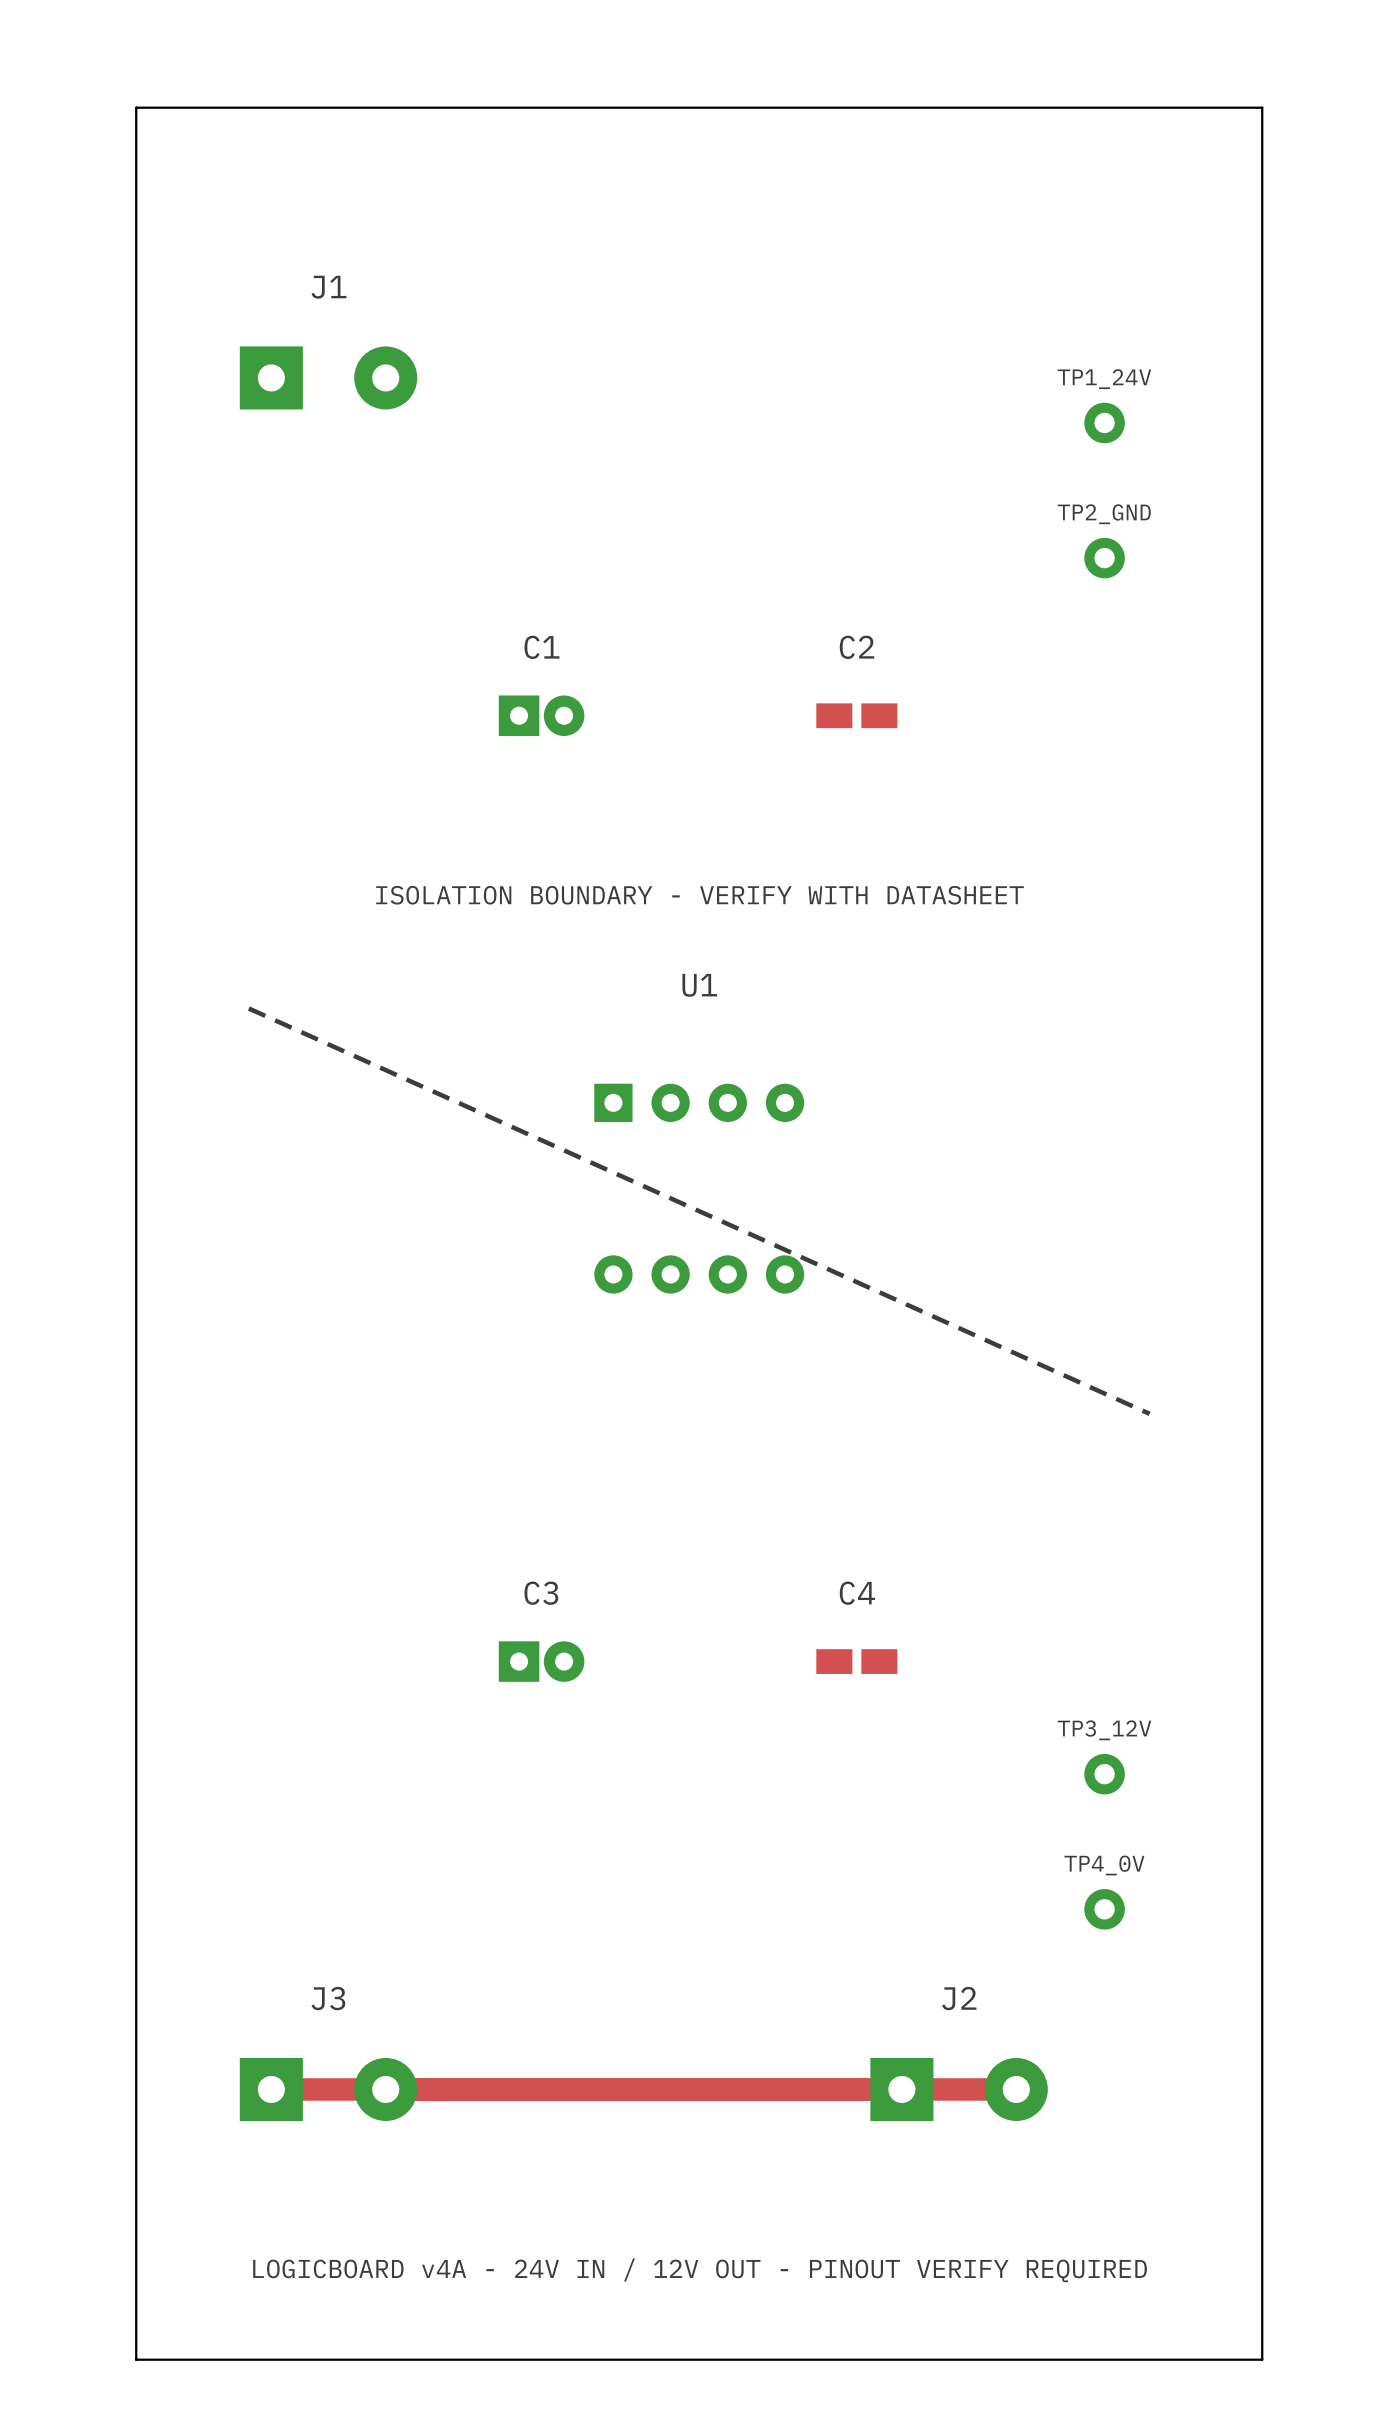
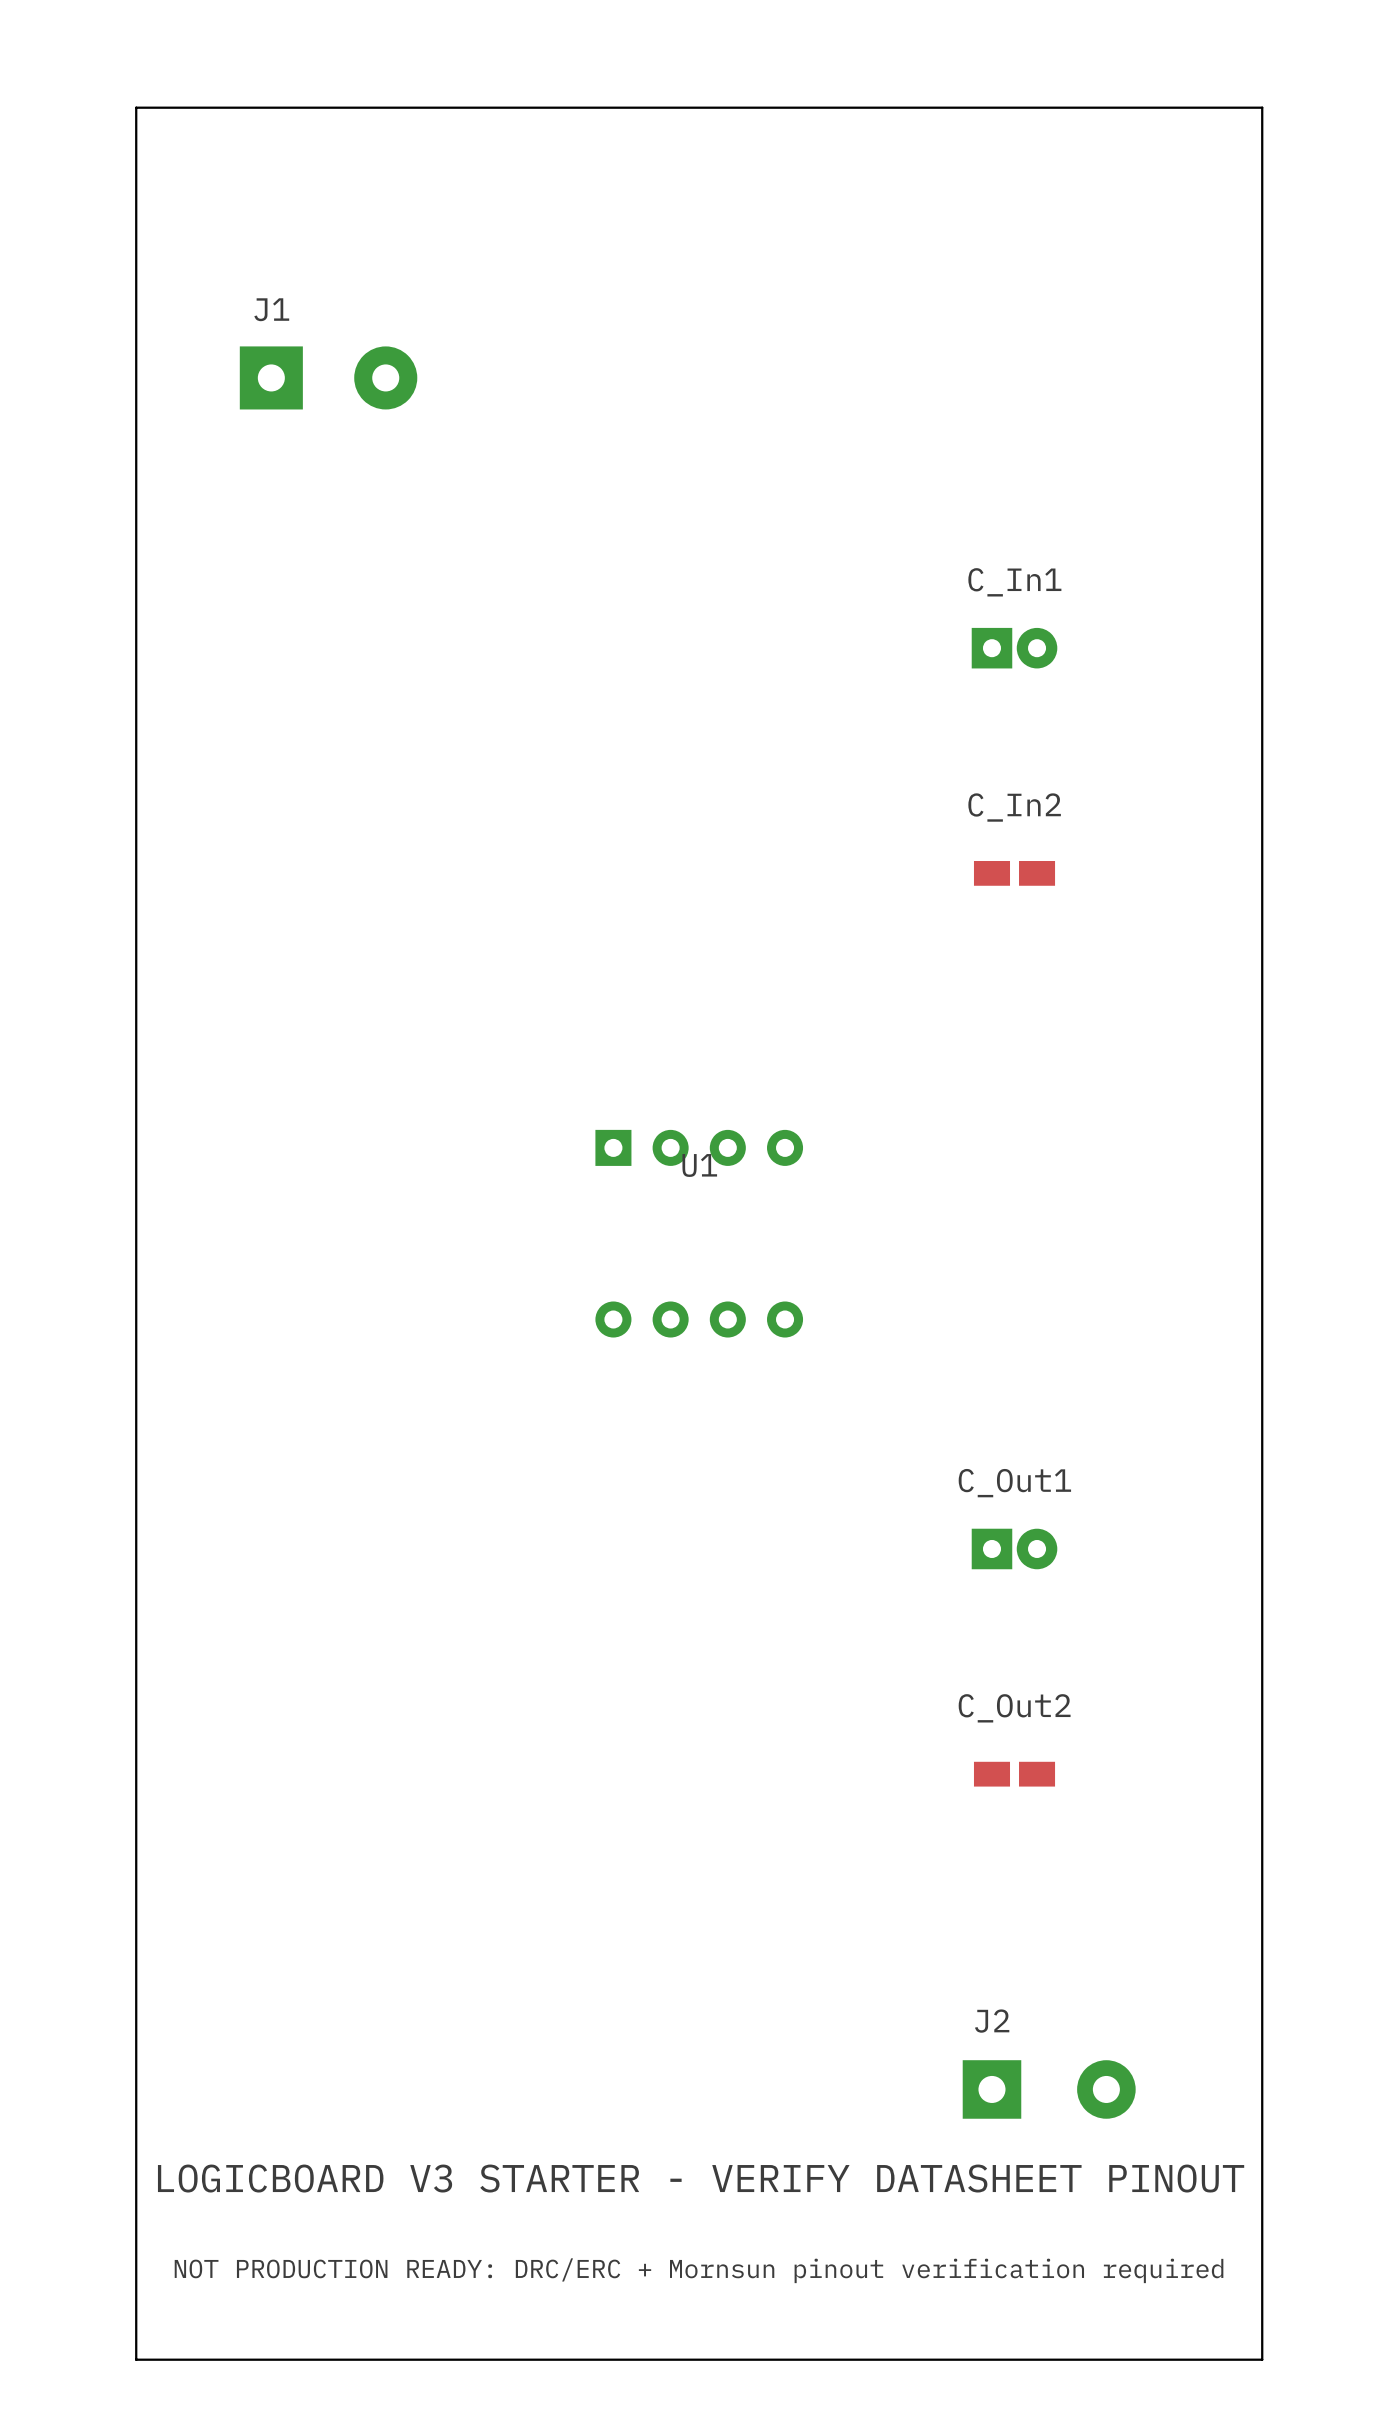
J1 name position: J1 (328, 287) -> J1 (271, 309)
TP1_24V: (1104, 422) -> none
TP2_GND: (1104, 558) -> none
C_In1: none -> (1014, 648)
C1: (541, 715) -> none
C2: (856, 715) -> none
C_In2: none -> (1014, 873)
text: ISOLATION BOUNDARY - VERIFY WITH DATASHEET (699, 895) -> none
U1 name position: U1 (699, 985) -> U1 (699, 1165)
line: (248, 1008) (1149, 1413) -> none
U1 footprint: [594, 1083, 805, 1294] -> [595, 1129, 804, 1338]
C_Out1: none -> (1014, 1548)
C3: (541, 1661) -> none
C4: (856, 1661) -> none
C_Out2: none -> (1014, 1774)
TP3_12V: (1104, 1774) -> none
TP4_0V: (1104, 1909) -> none
J2 name position: J2 (959, 1998) -> J2 (992, 2021)
J2 footprint: [870, 2057, 1048, 2121] -> [962, 2060, 1136, 2119]
track: (271, 2089) (1016, 2089) -> none
J3: (328, 2089) -> none
text: none -> LOGICBOARD V3 STARTER - VERIFY DATASHEET PINOUT (701, 2178)
text: LOGICBOARD v4A - 24V IN / 12V OUT - PINOUT VERIFY REQUIRED (700, 2270) -> NOT PRODUCTION READY: DRC/ERC + Mornsun pinout verification required (699, 2270)

